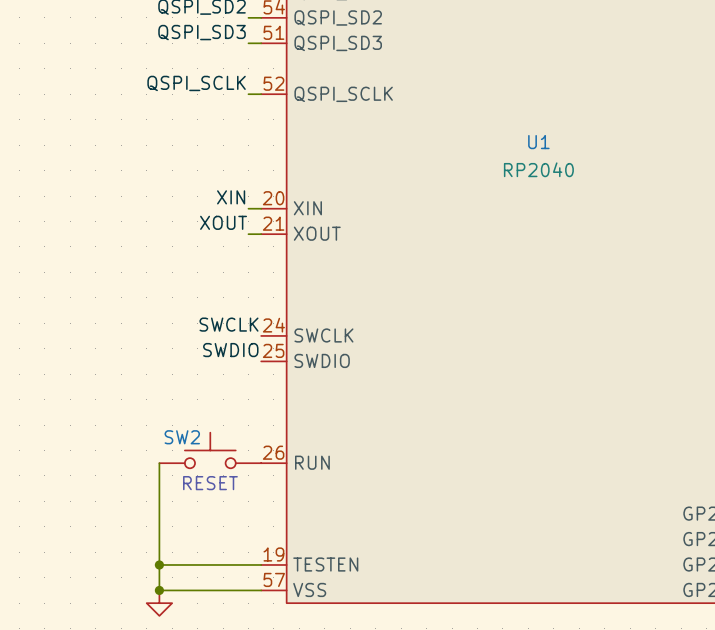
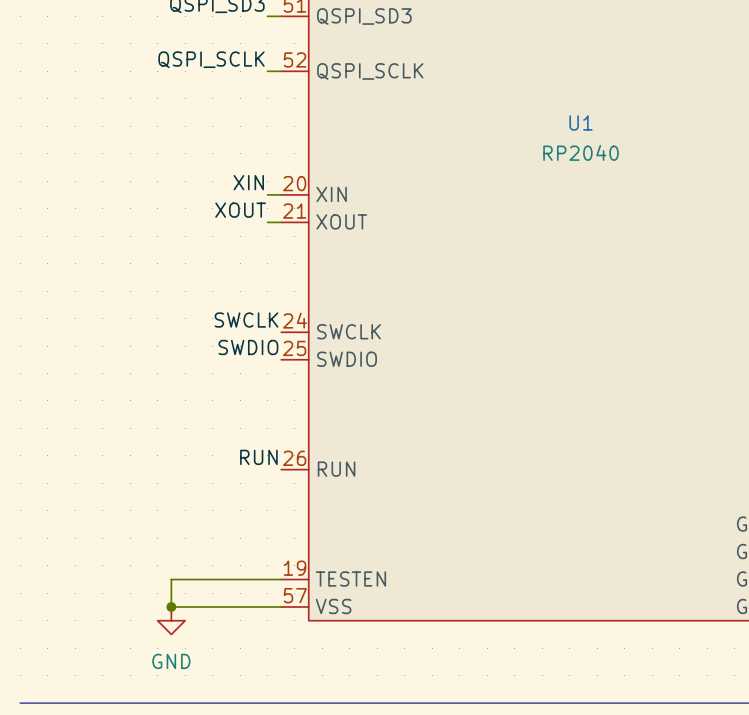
SW2: (210, 450) -> none
label: none -> RUN (258, 457)
wire: (159, 463) (159, 564) -> none
text: RESET (210, 483) -> none
junction: (159, 564) -> none

